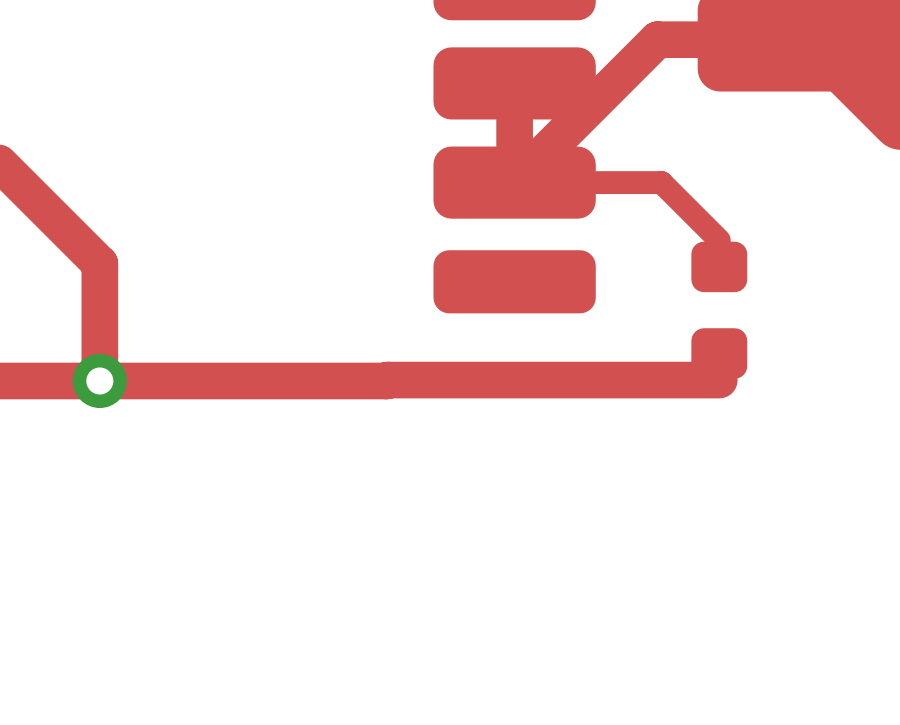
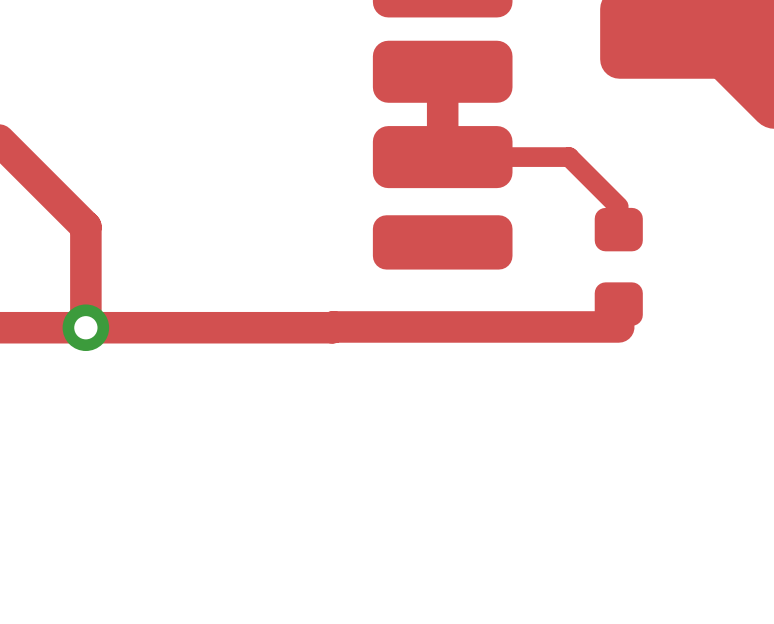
top track: (819, 39) (657, 39) (514, 182) -> none

